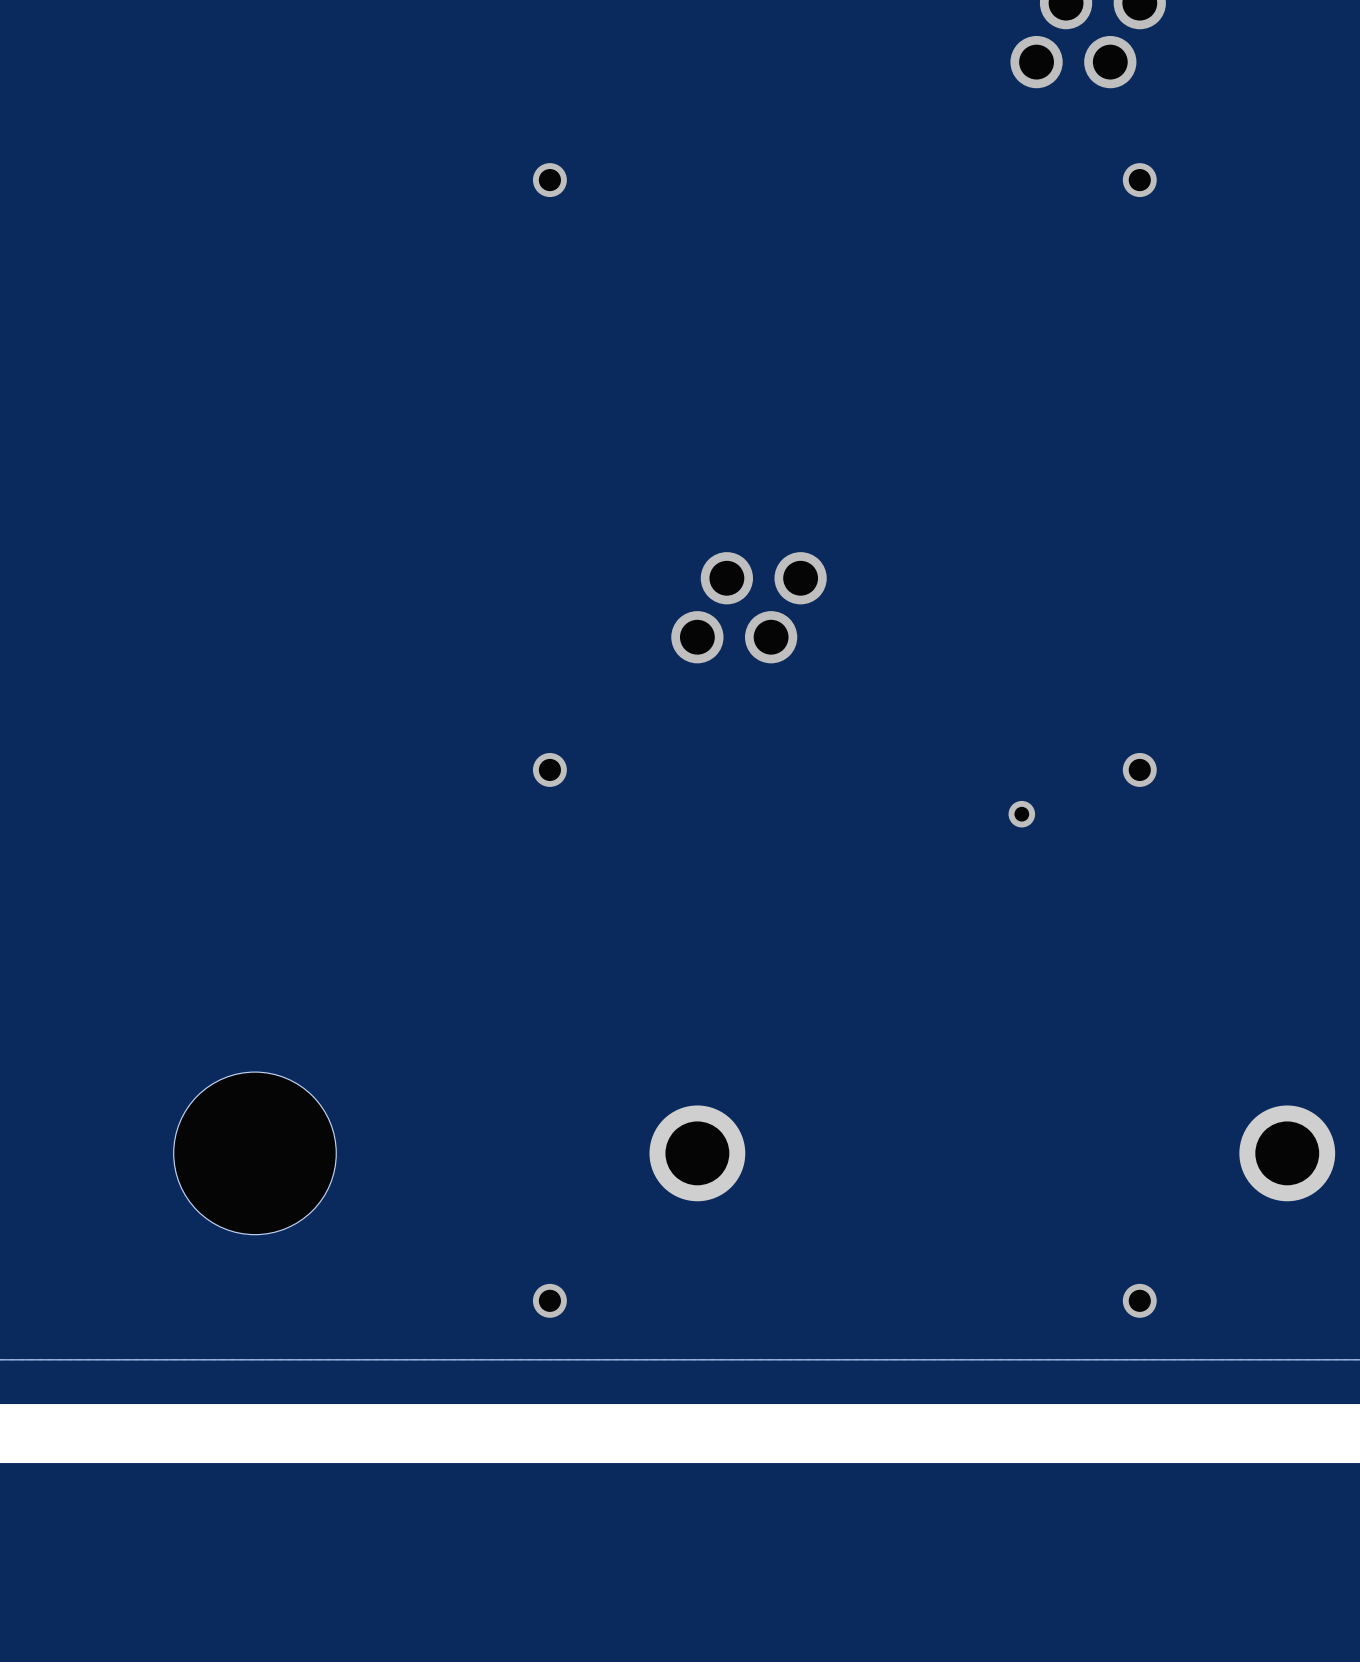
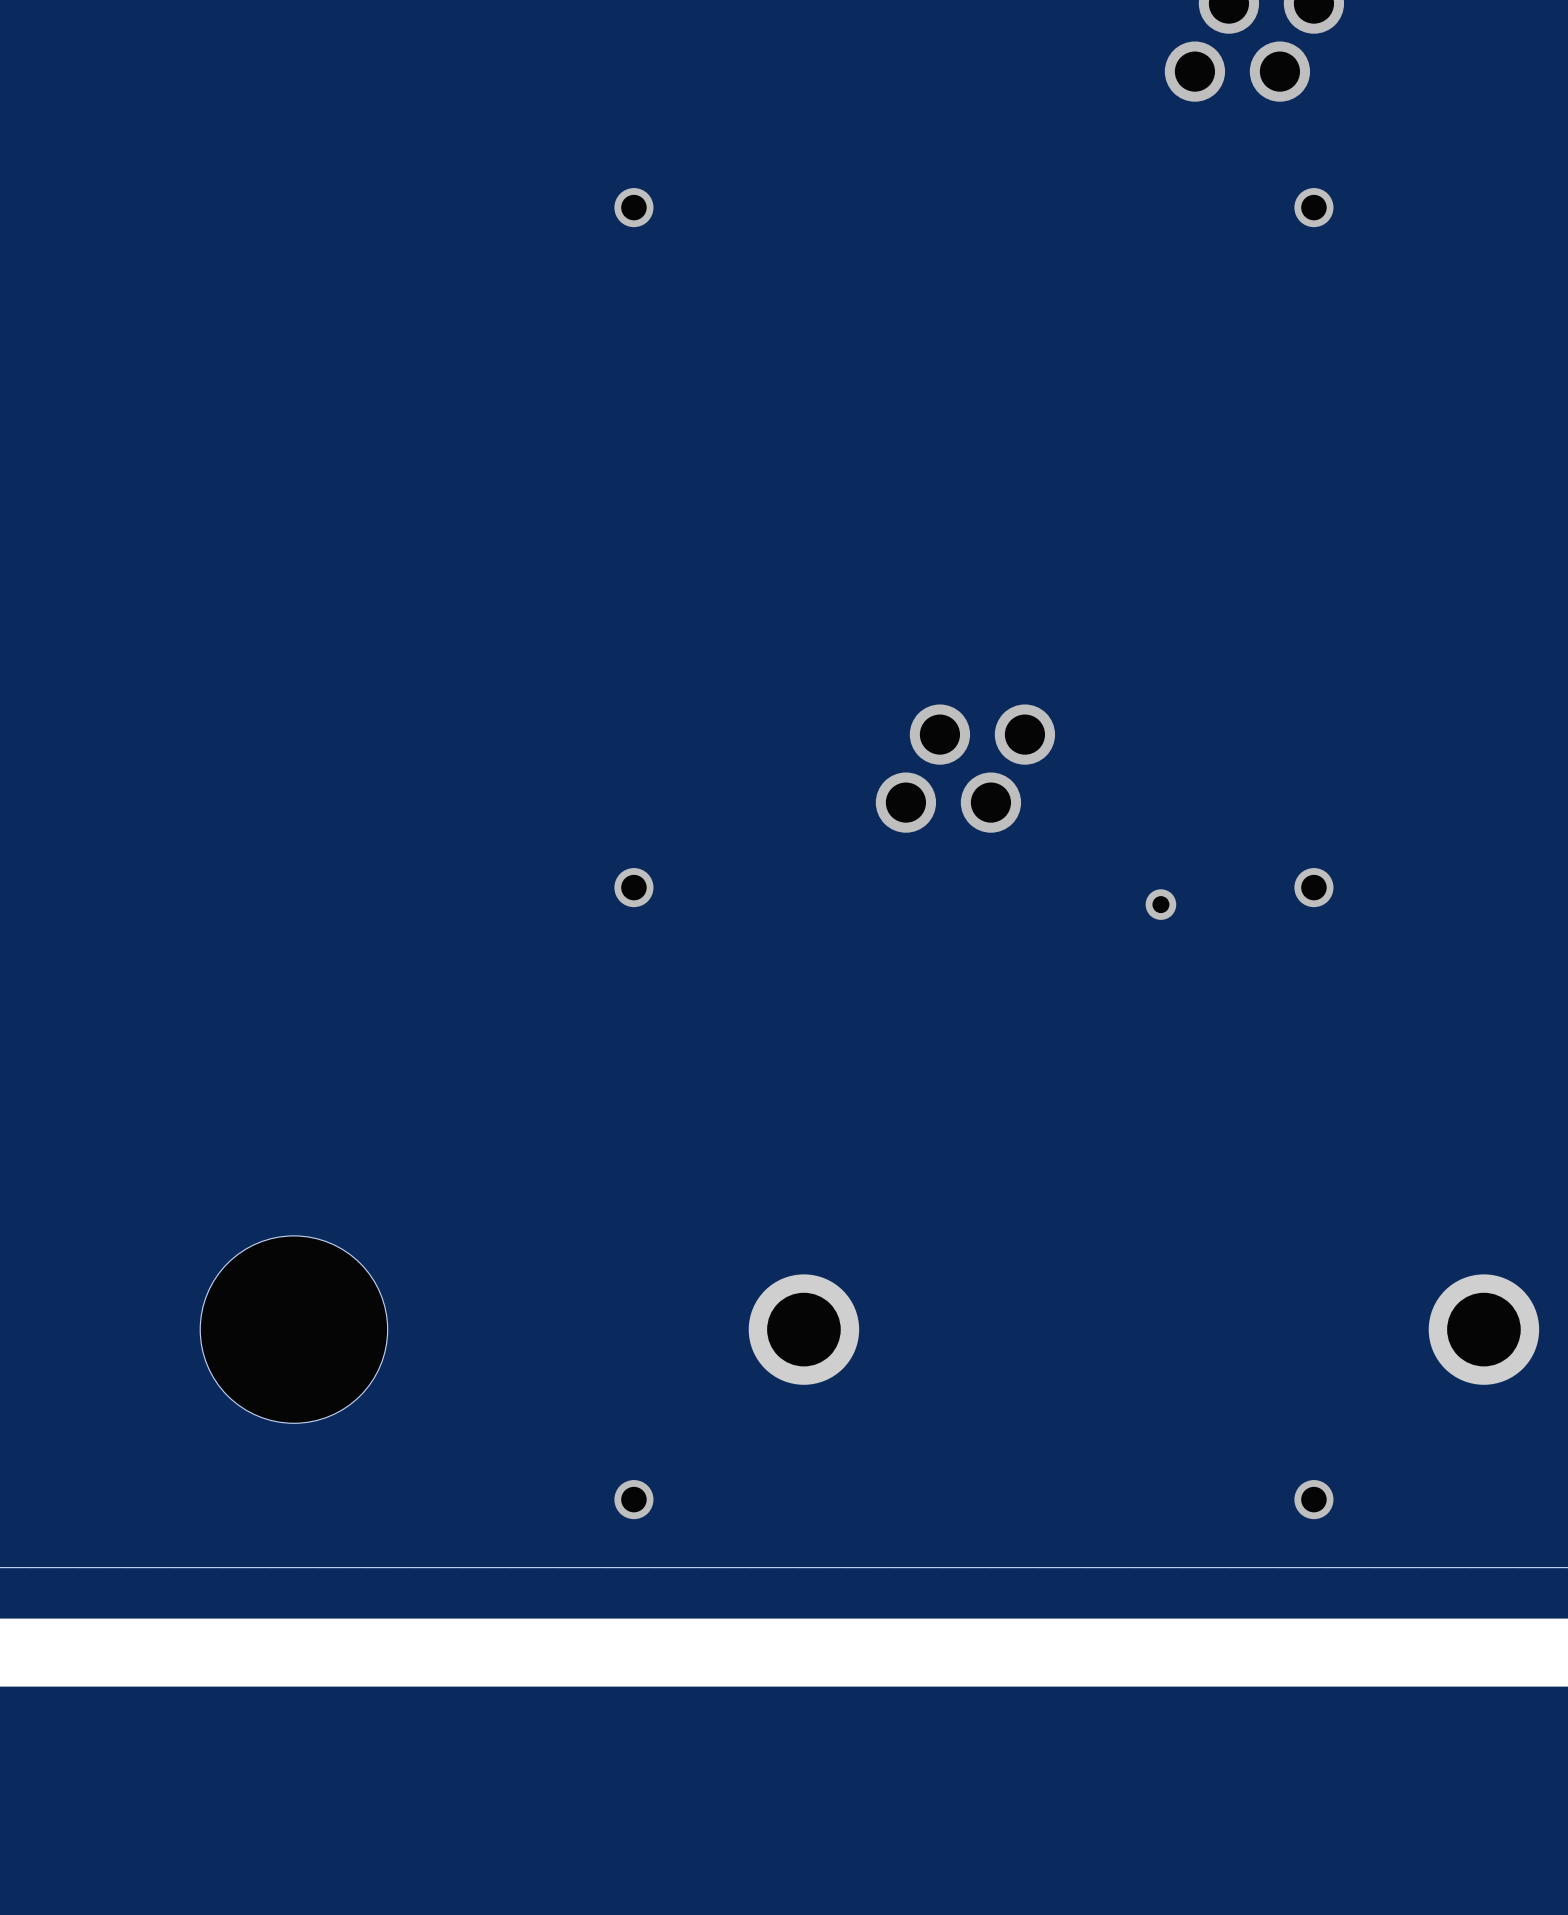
via: (726, 578) -> none
via: (800, 578) -> none
via: (697, 637) -> none
via position: (771, 637) -> (939, 734)
via: none -> (1024, 734)
via: none -> (905, 802)
via: none -> (990, 802)
via position: (1021, 814) -> (1160, 904)

